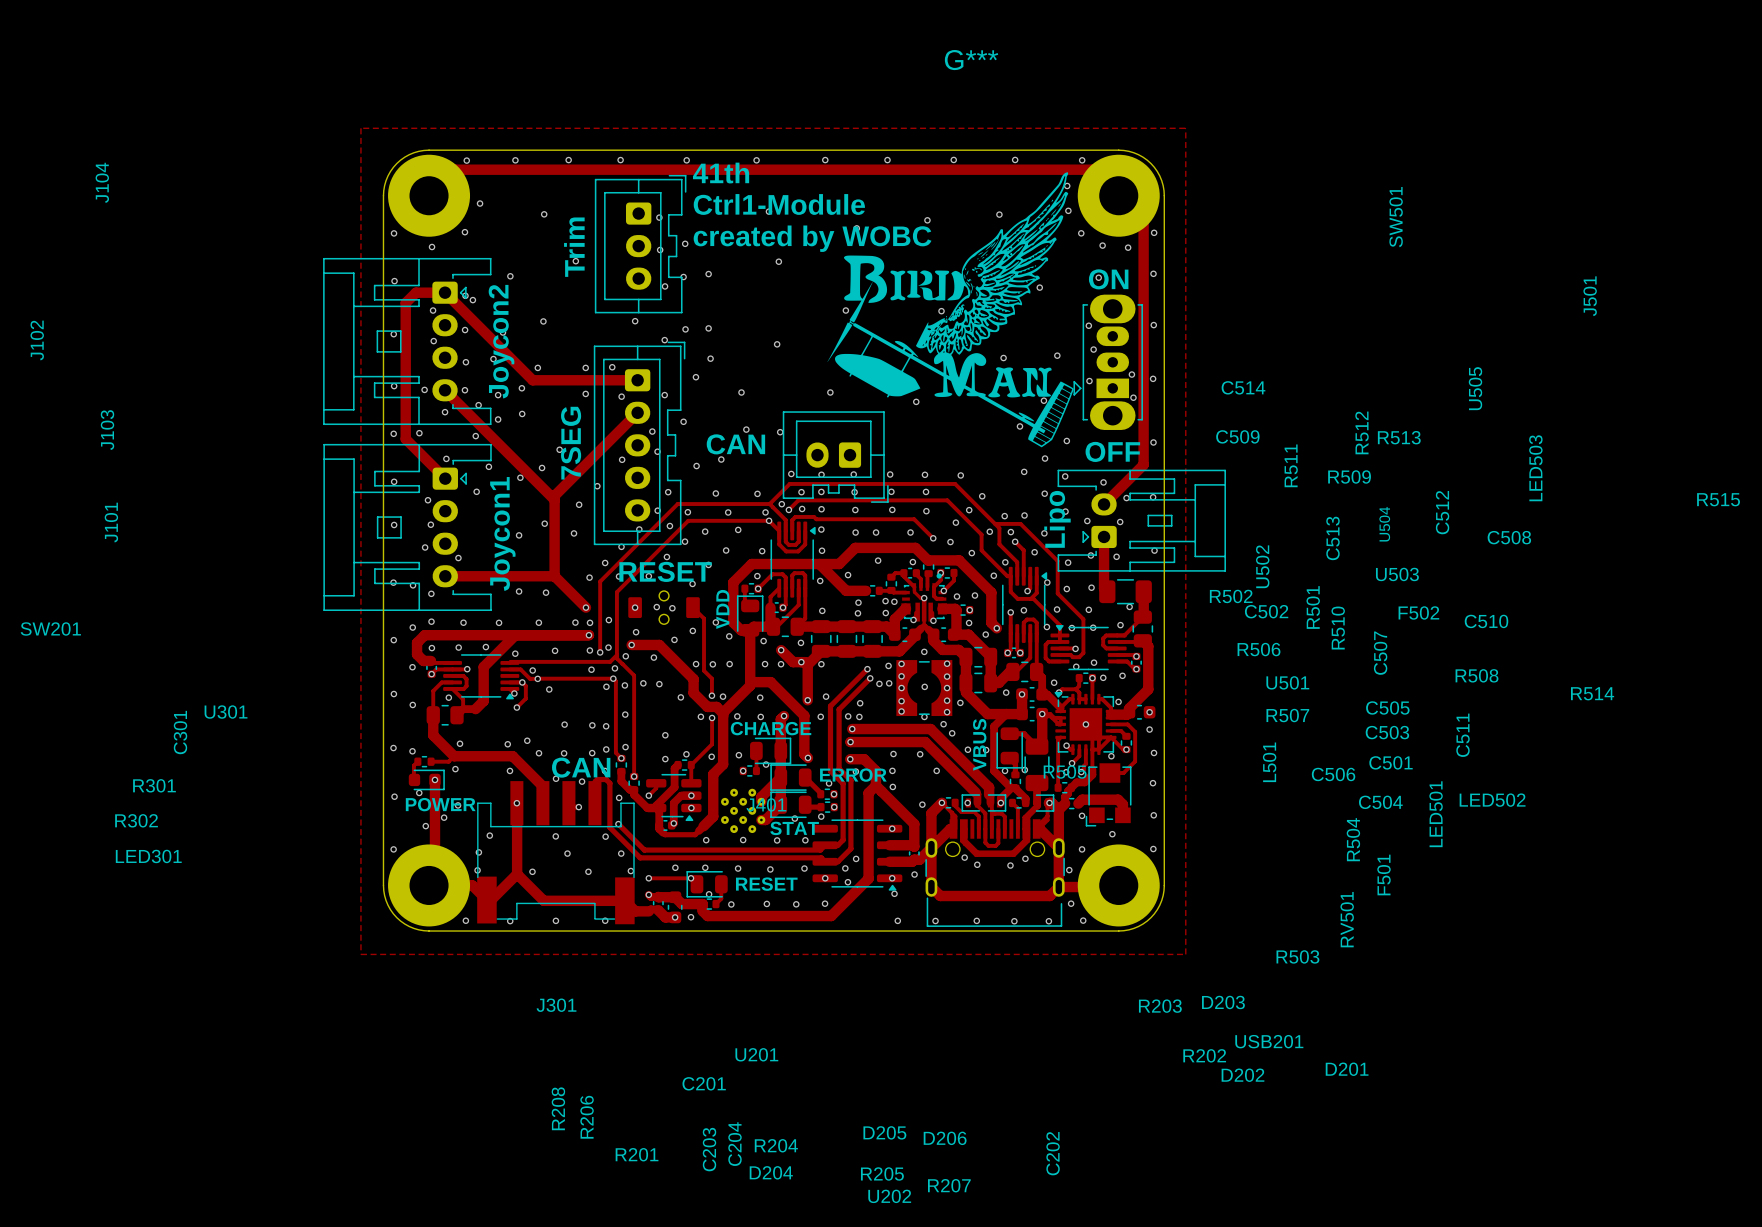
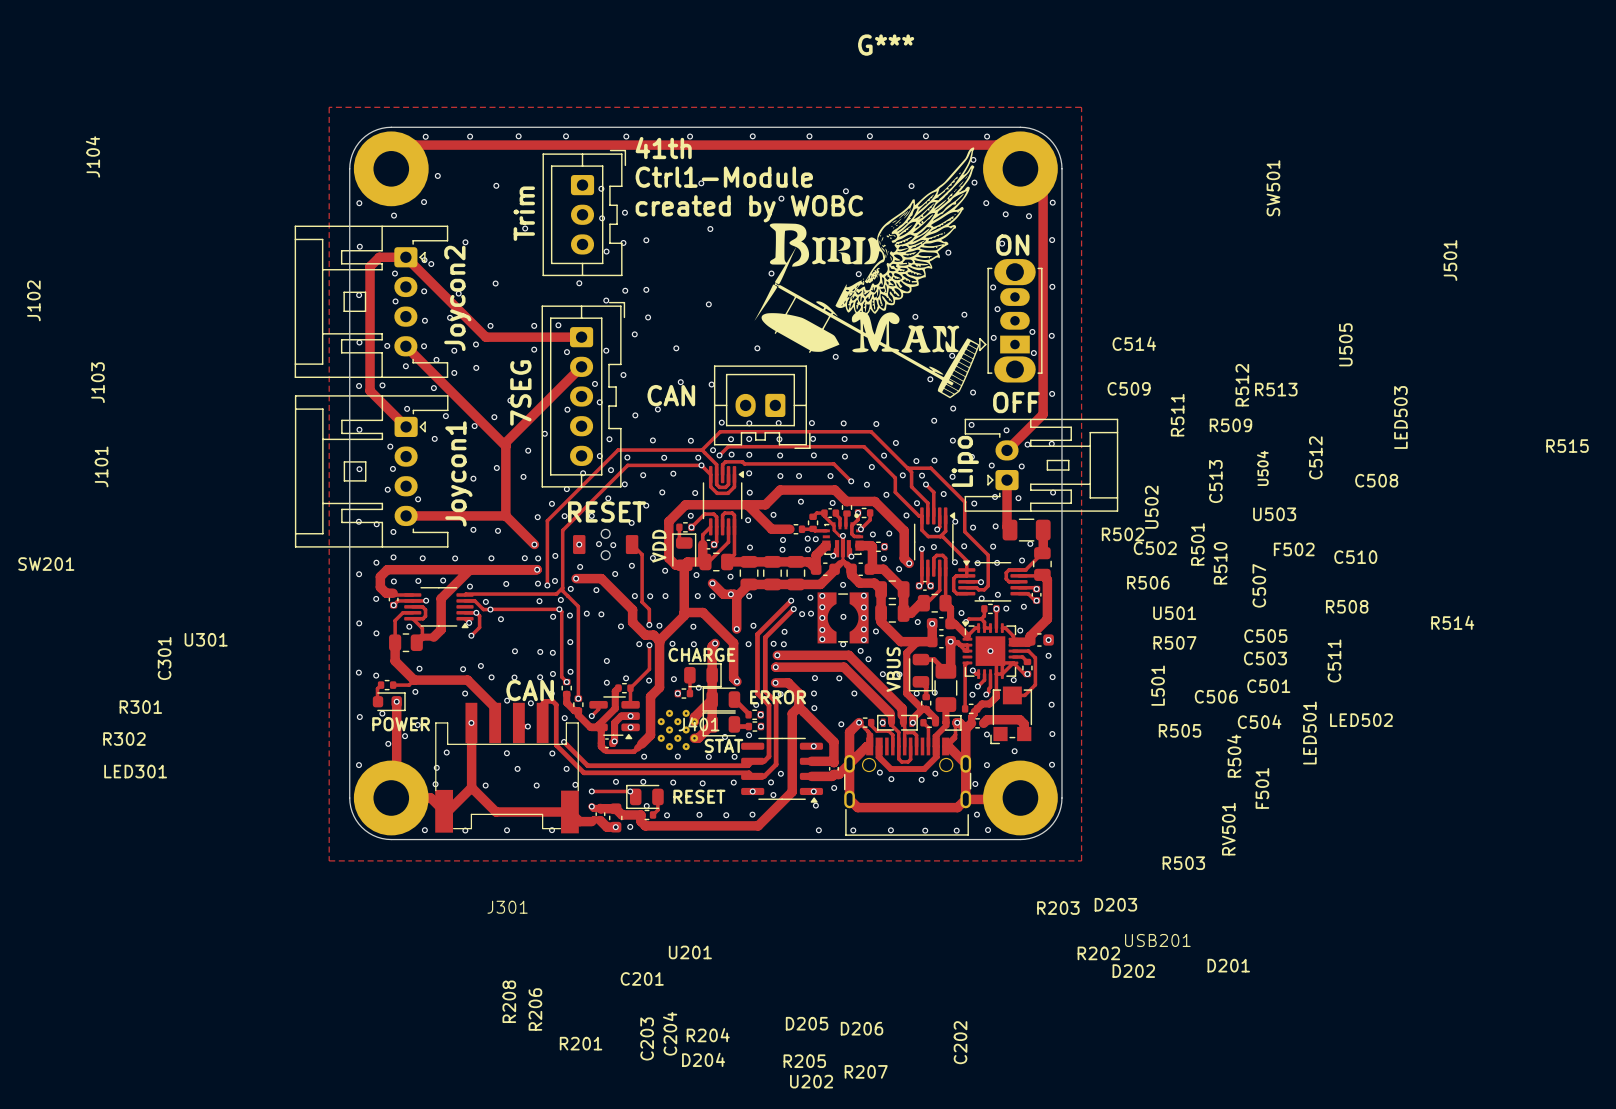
R505 name position: R505 (1065, 772) -> R505 (1180, 730)

